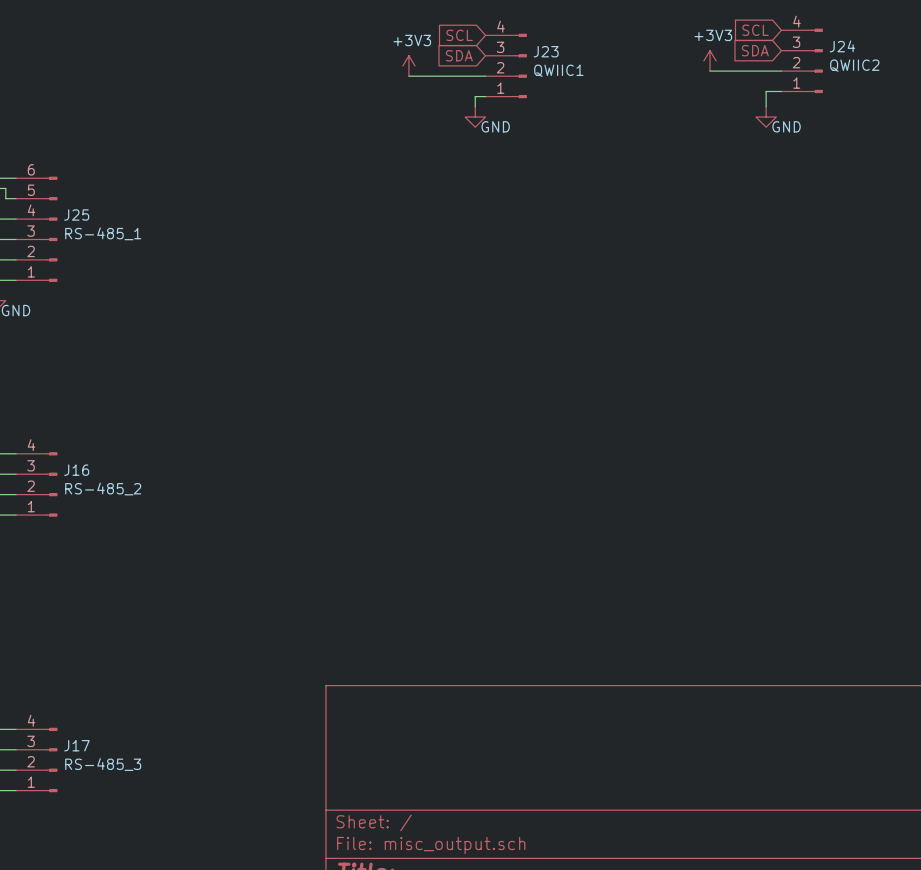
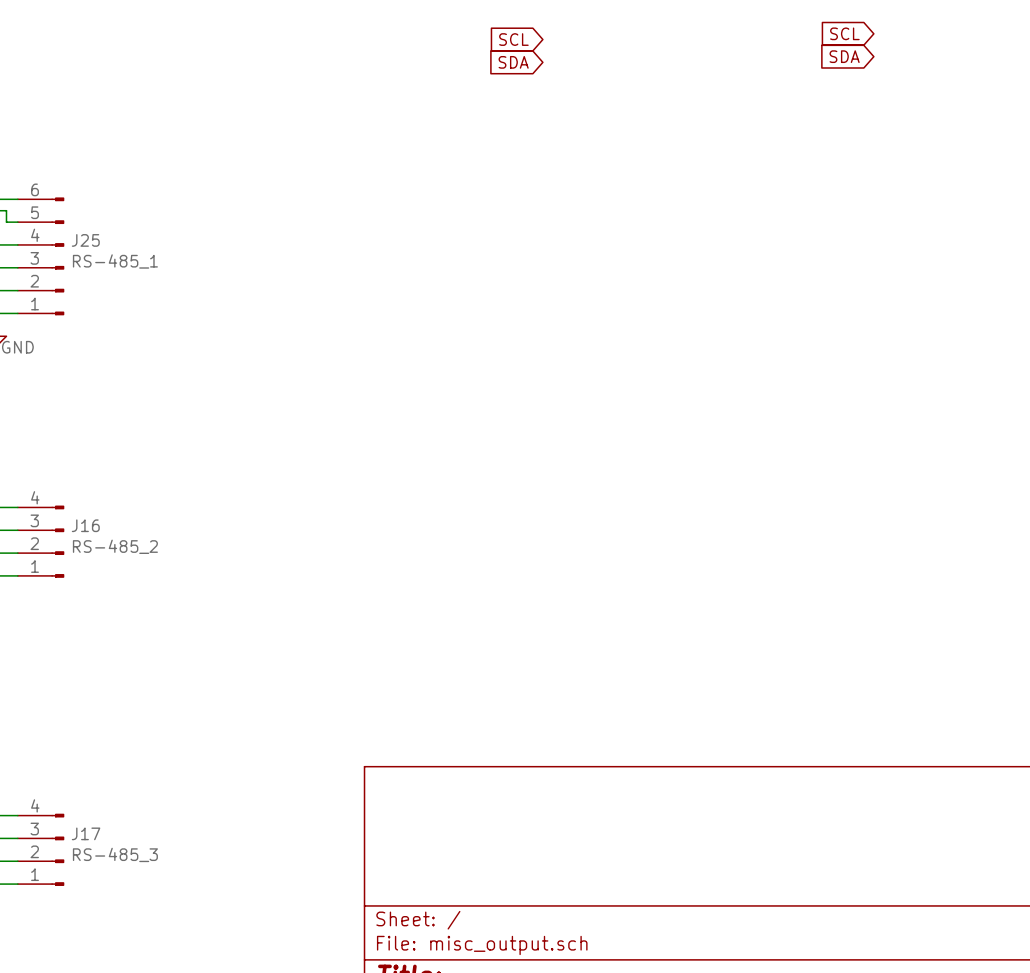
power symbol: +3V3 (710, 60) -> none
J24: QWIIC2 (802, 60) -> none
power symbol: +3V3 (408, 65) -> none
J23: QWIIC1 (506, 65) -> none
wire: (710, 71) (781, 71) -> none
wire: (408, 76) (485, 76) -> none
wire: (781, 91) (766, 91) (766, 106) -> none
wire: (485, 96) (475, 96) (475, 106) -> none
power symbol: GND (475, 117) -> none
power symbol: GND (766, 117) -> none

